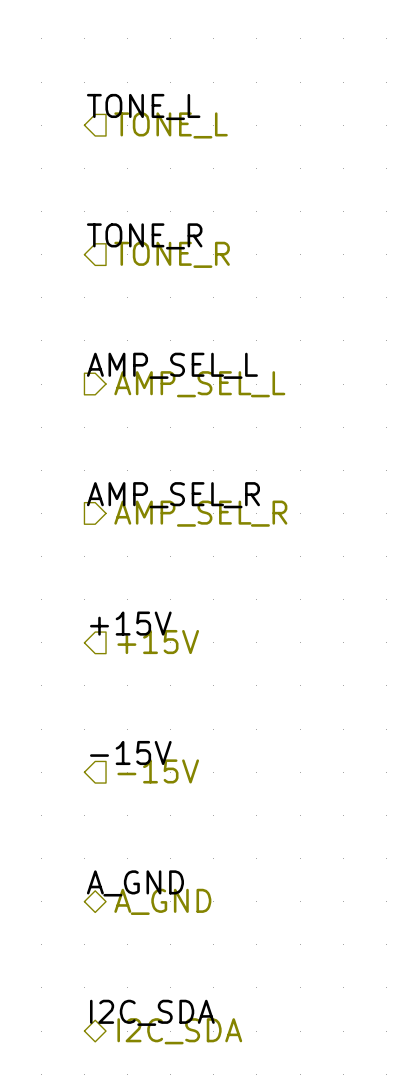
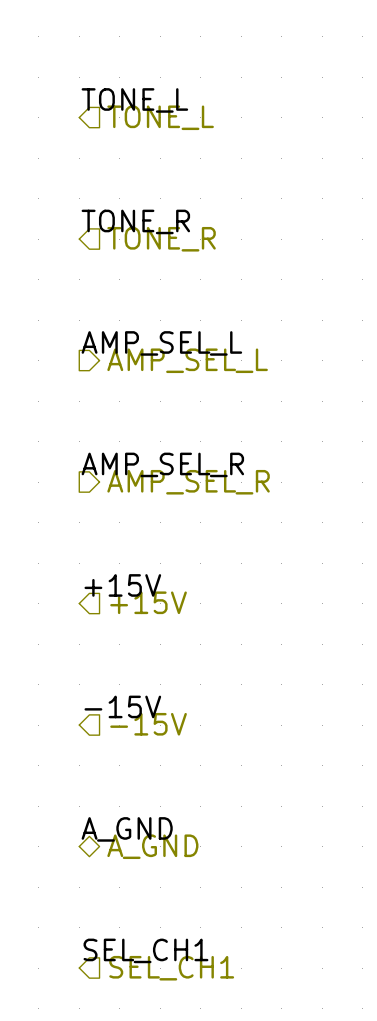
label: I2C_SDA (152, 1012) -> SEL_CH1 (145, 950)
hierarchical label shape: bidirectional (179, 1031) -> input (171, 968)
hierarchical label: I2C_SDA (179, 1031) -> SEL_CH1 (171, 968)

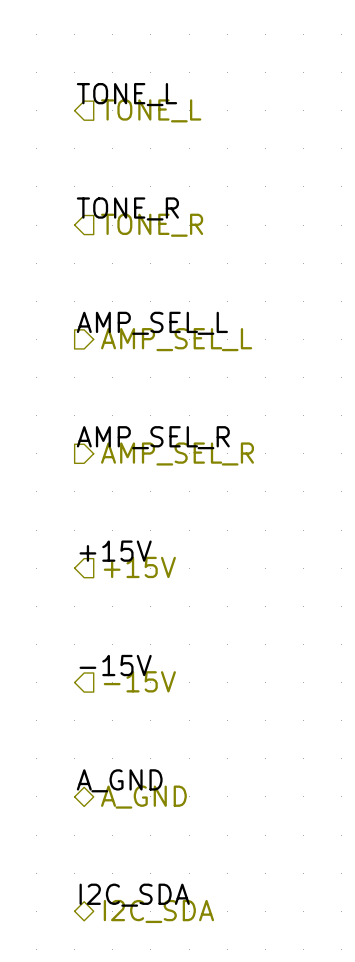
label: SEL_CH1 (145, 950) -> I2C_SDA (134, 895)
hierarchical label shape: input (171, 968) -> bidirectional (158, 911)
hierarchical label: SEL_CH1 (171, 968) -> I2C_SDA (158, 911)

